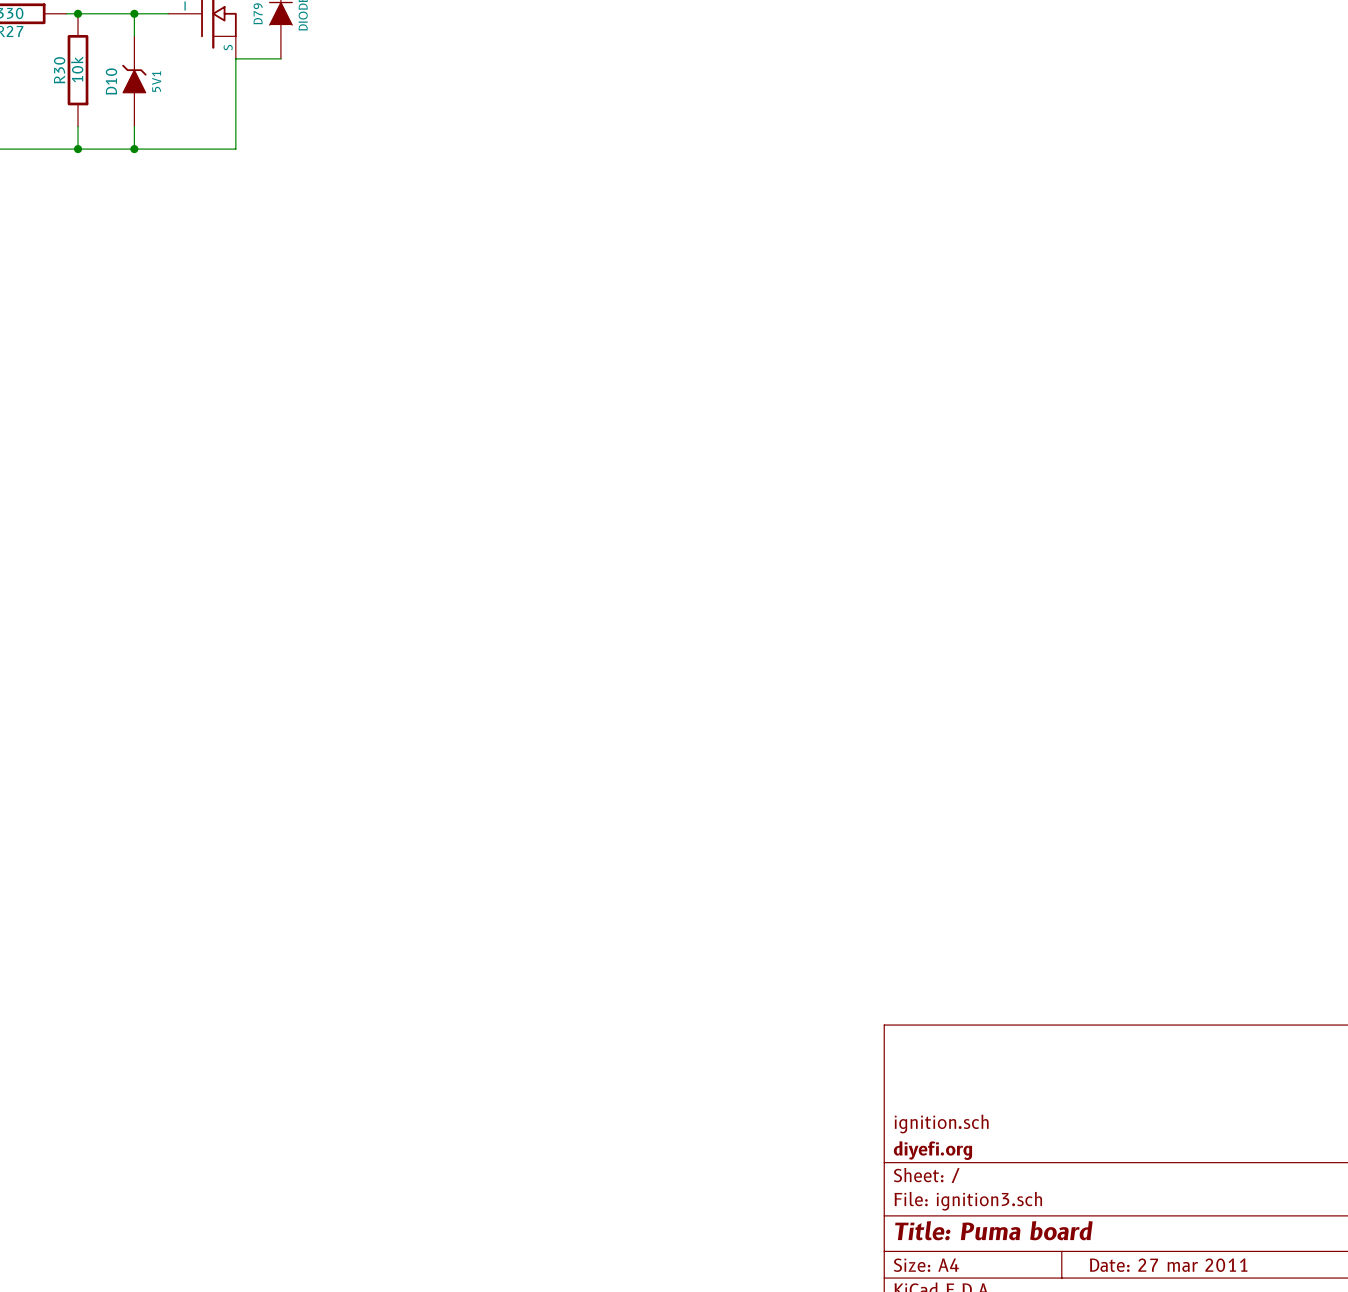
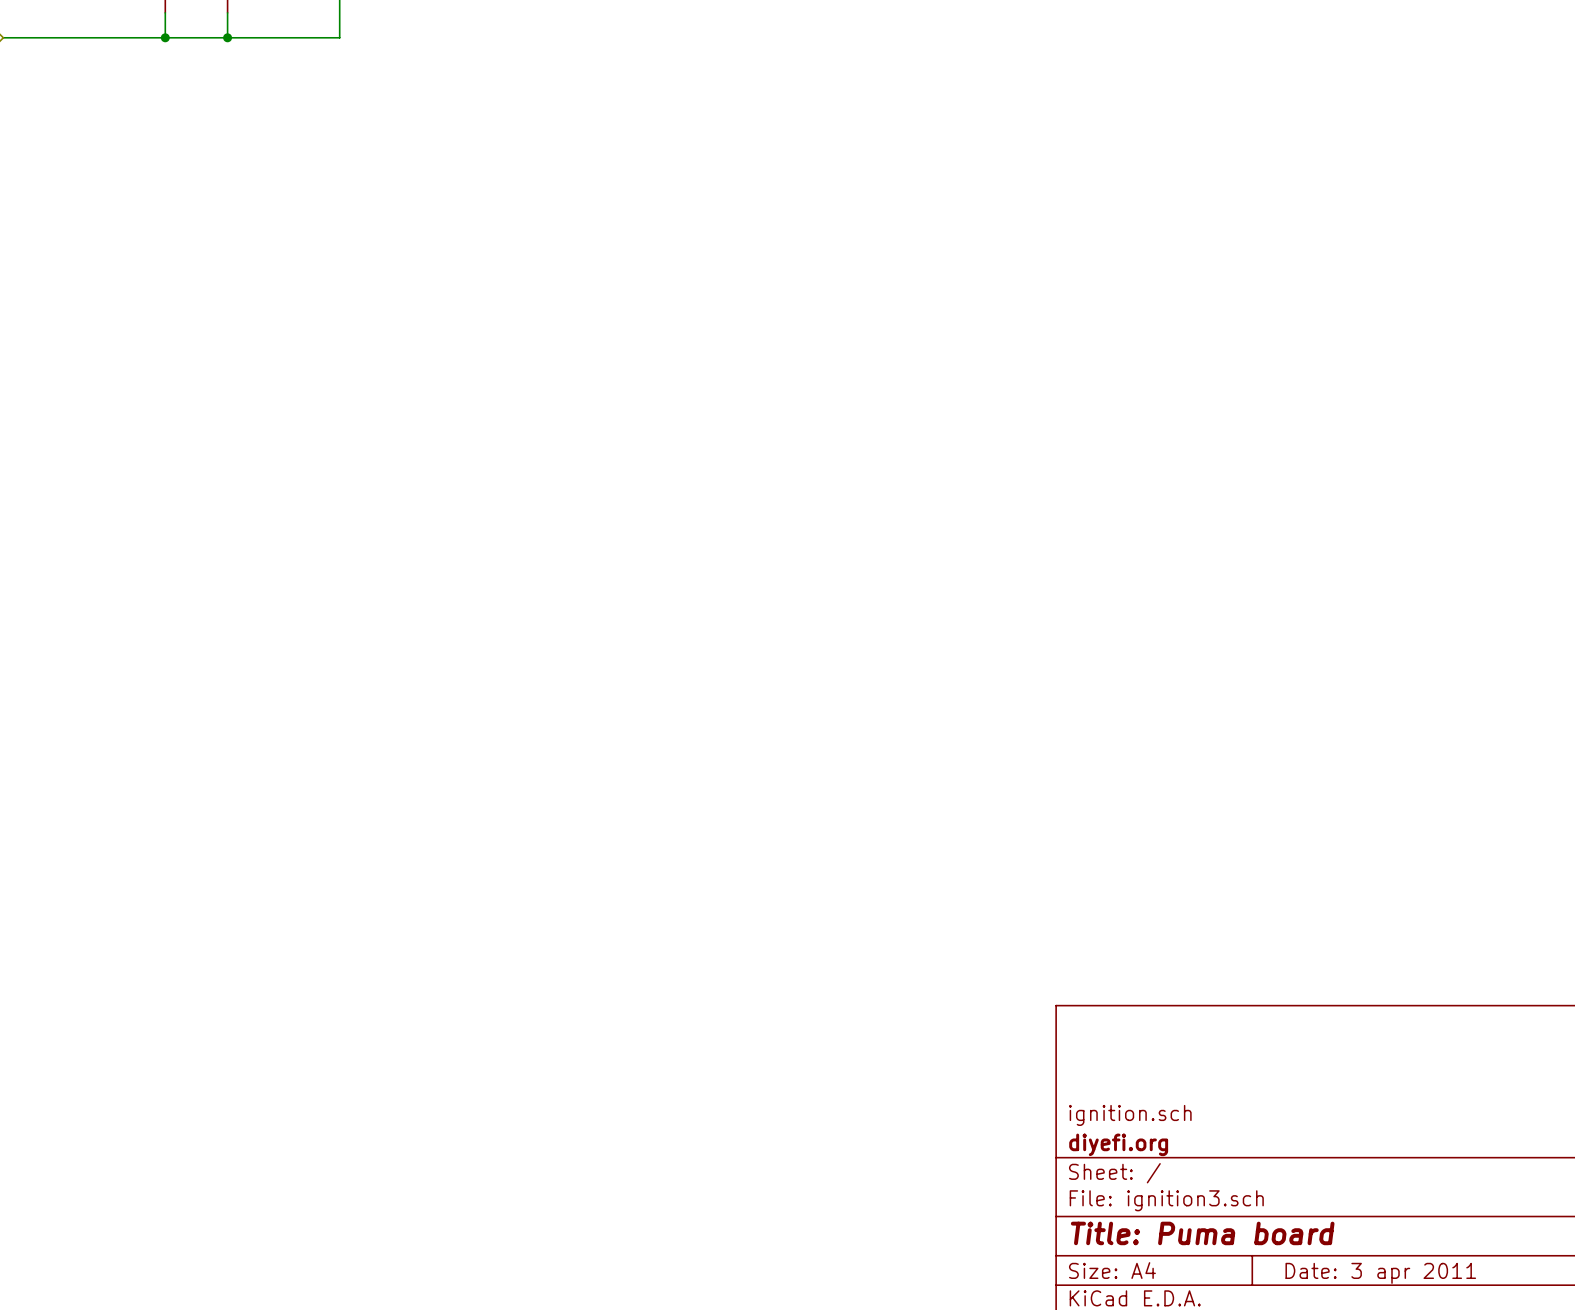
title block: Date: 27 mar 2011 (1168, 1265) -> Date: 3 apr 2011 (1380, 1273)

